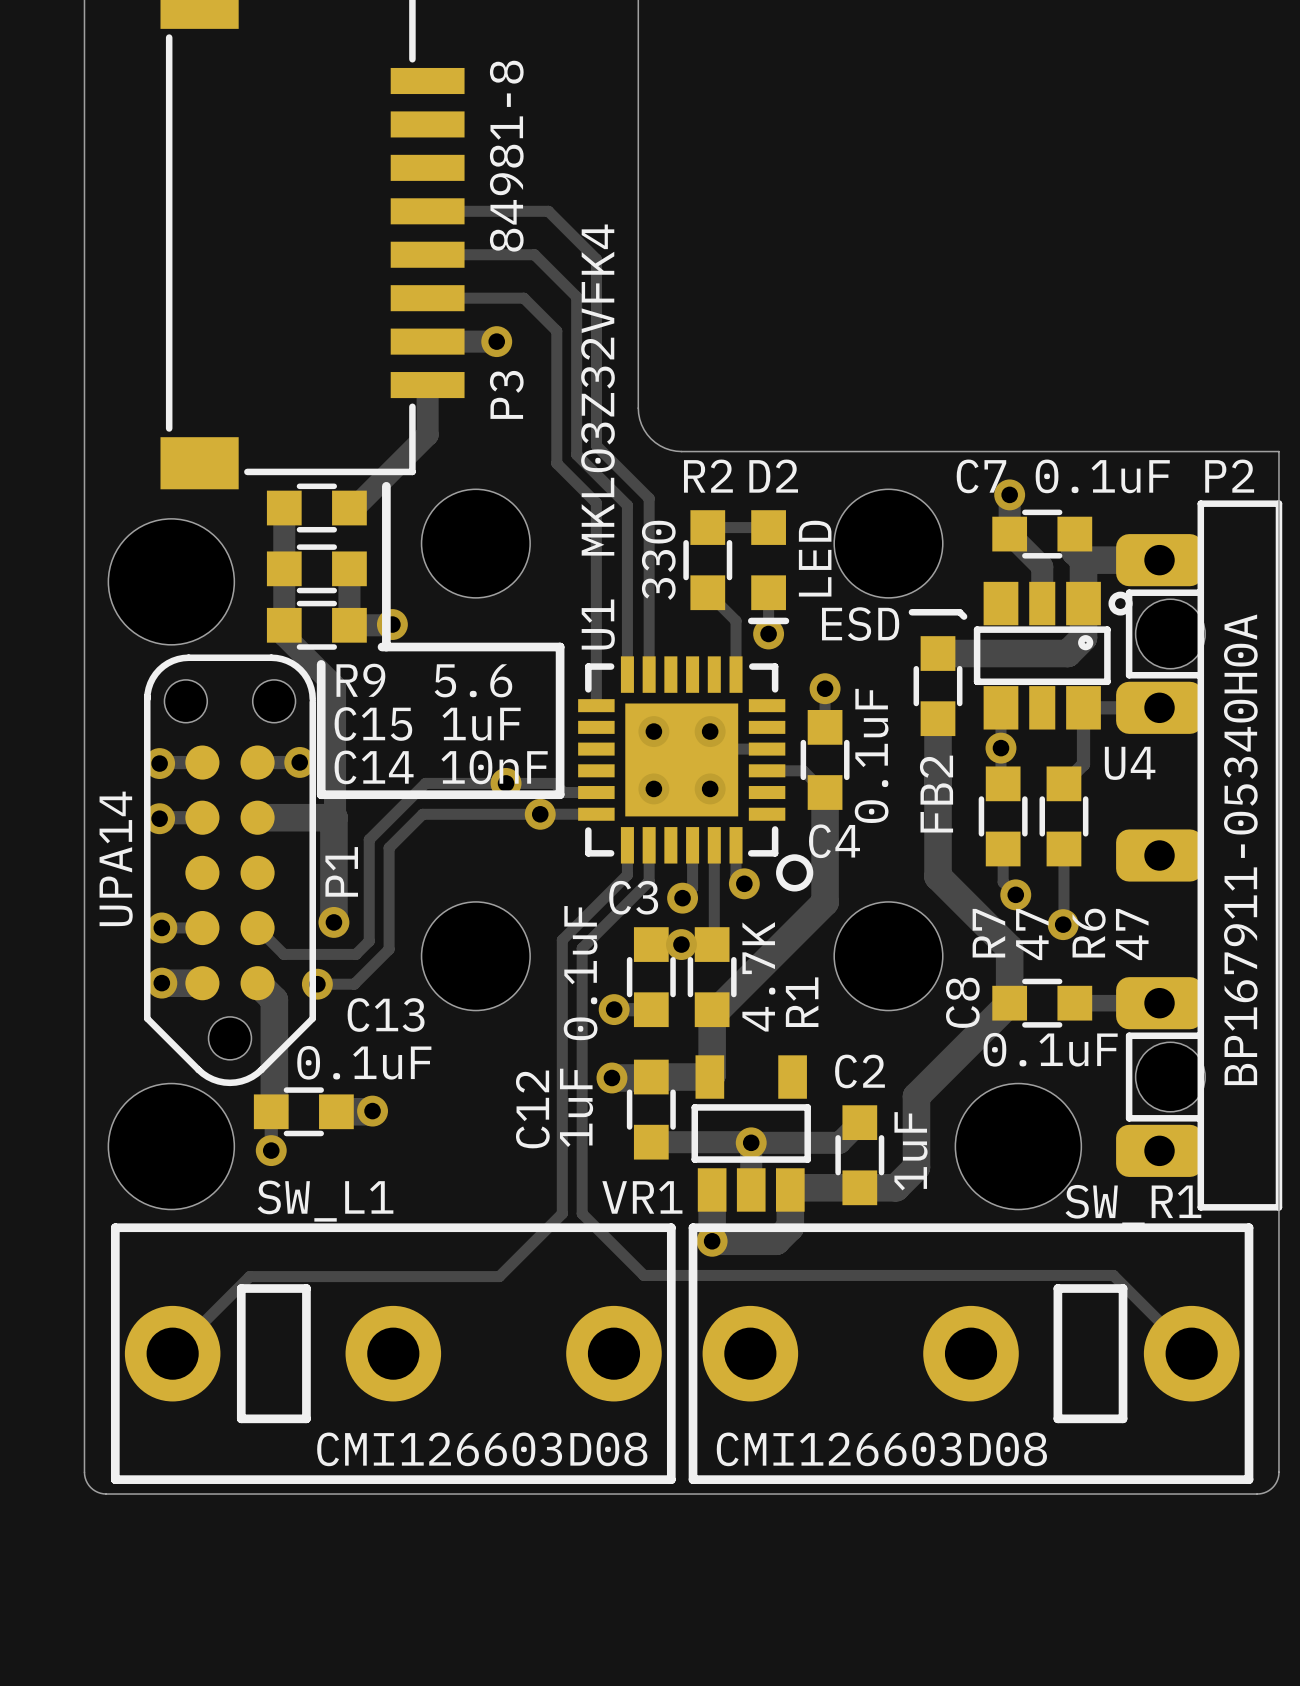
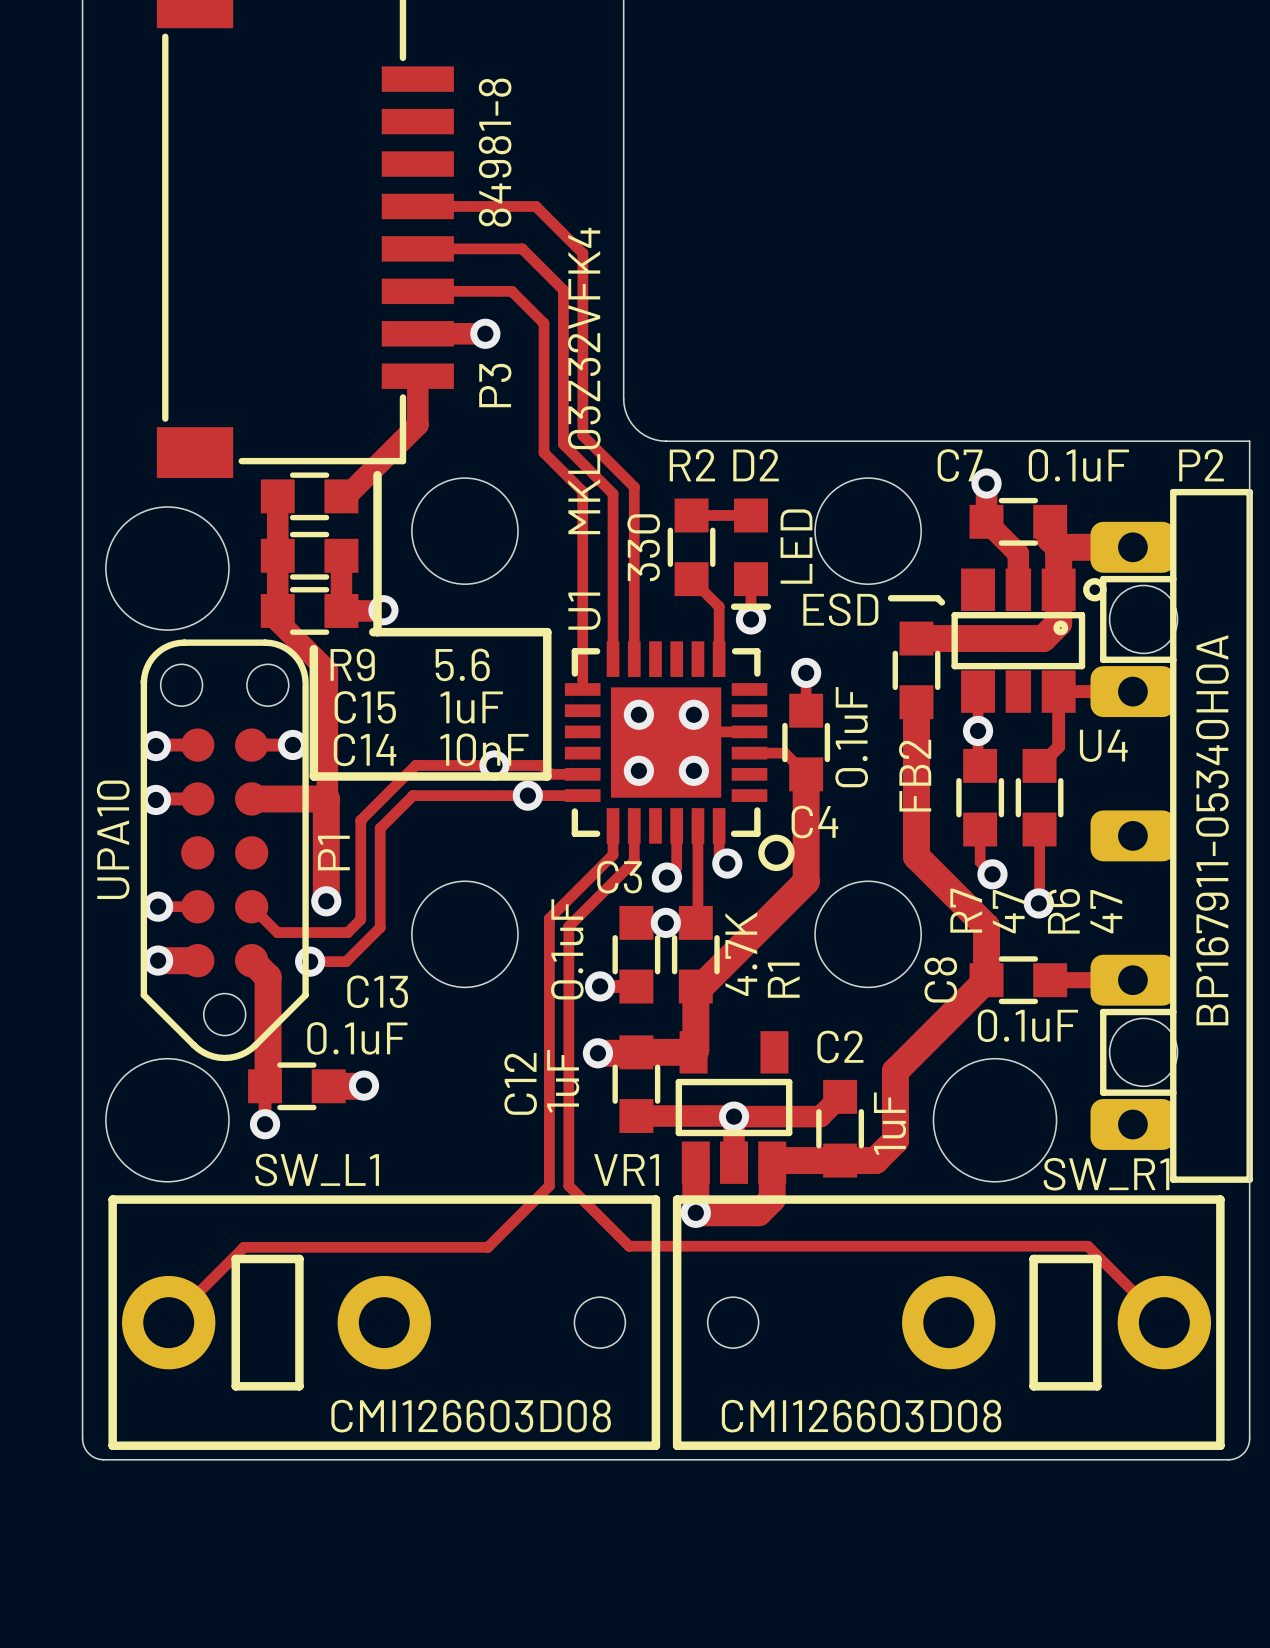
text: UPA14 (116, 858) -> UPA10 (113, 839)
SW_L1 footprint: [110, 1223, 676, 1484] -> [108, 1195, 661, 1450]
SW_R1 footprint: [688, 1223, 1254, 1484] -> [672, 1195, 1225, 1450]

